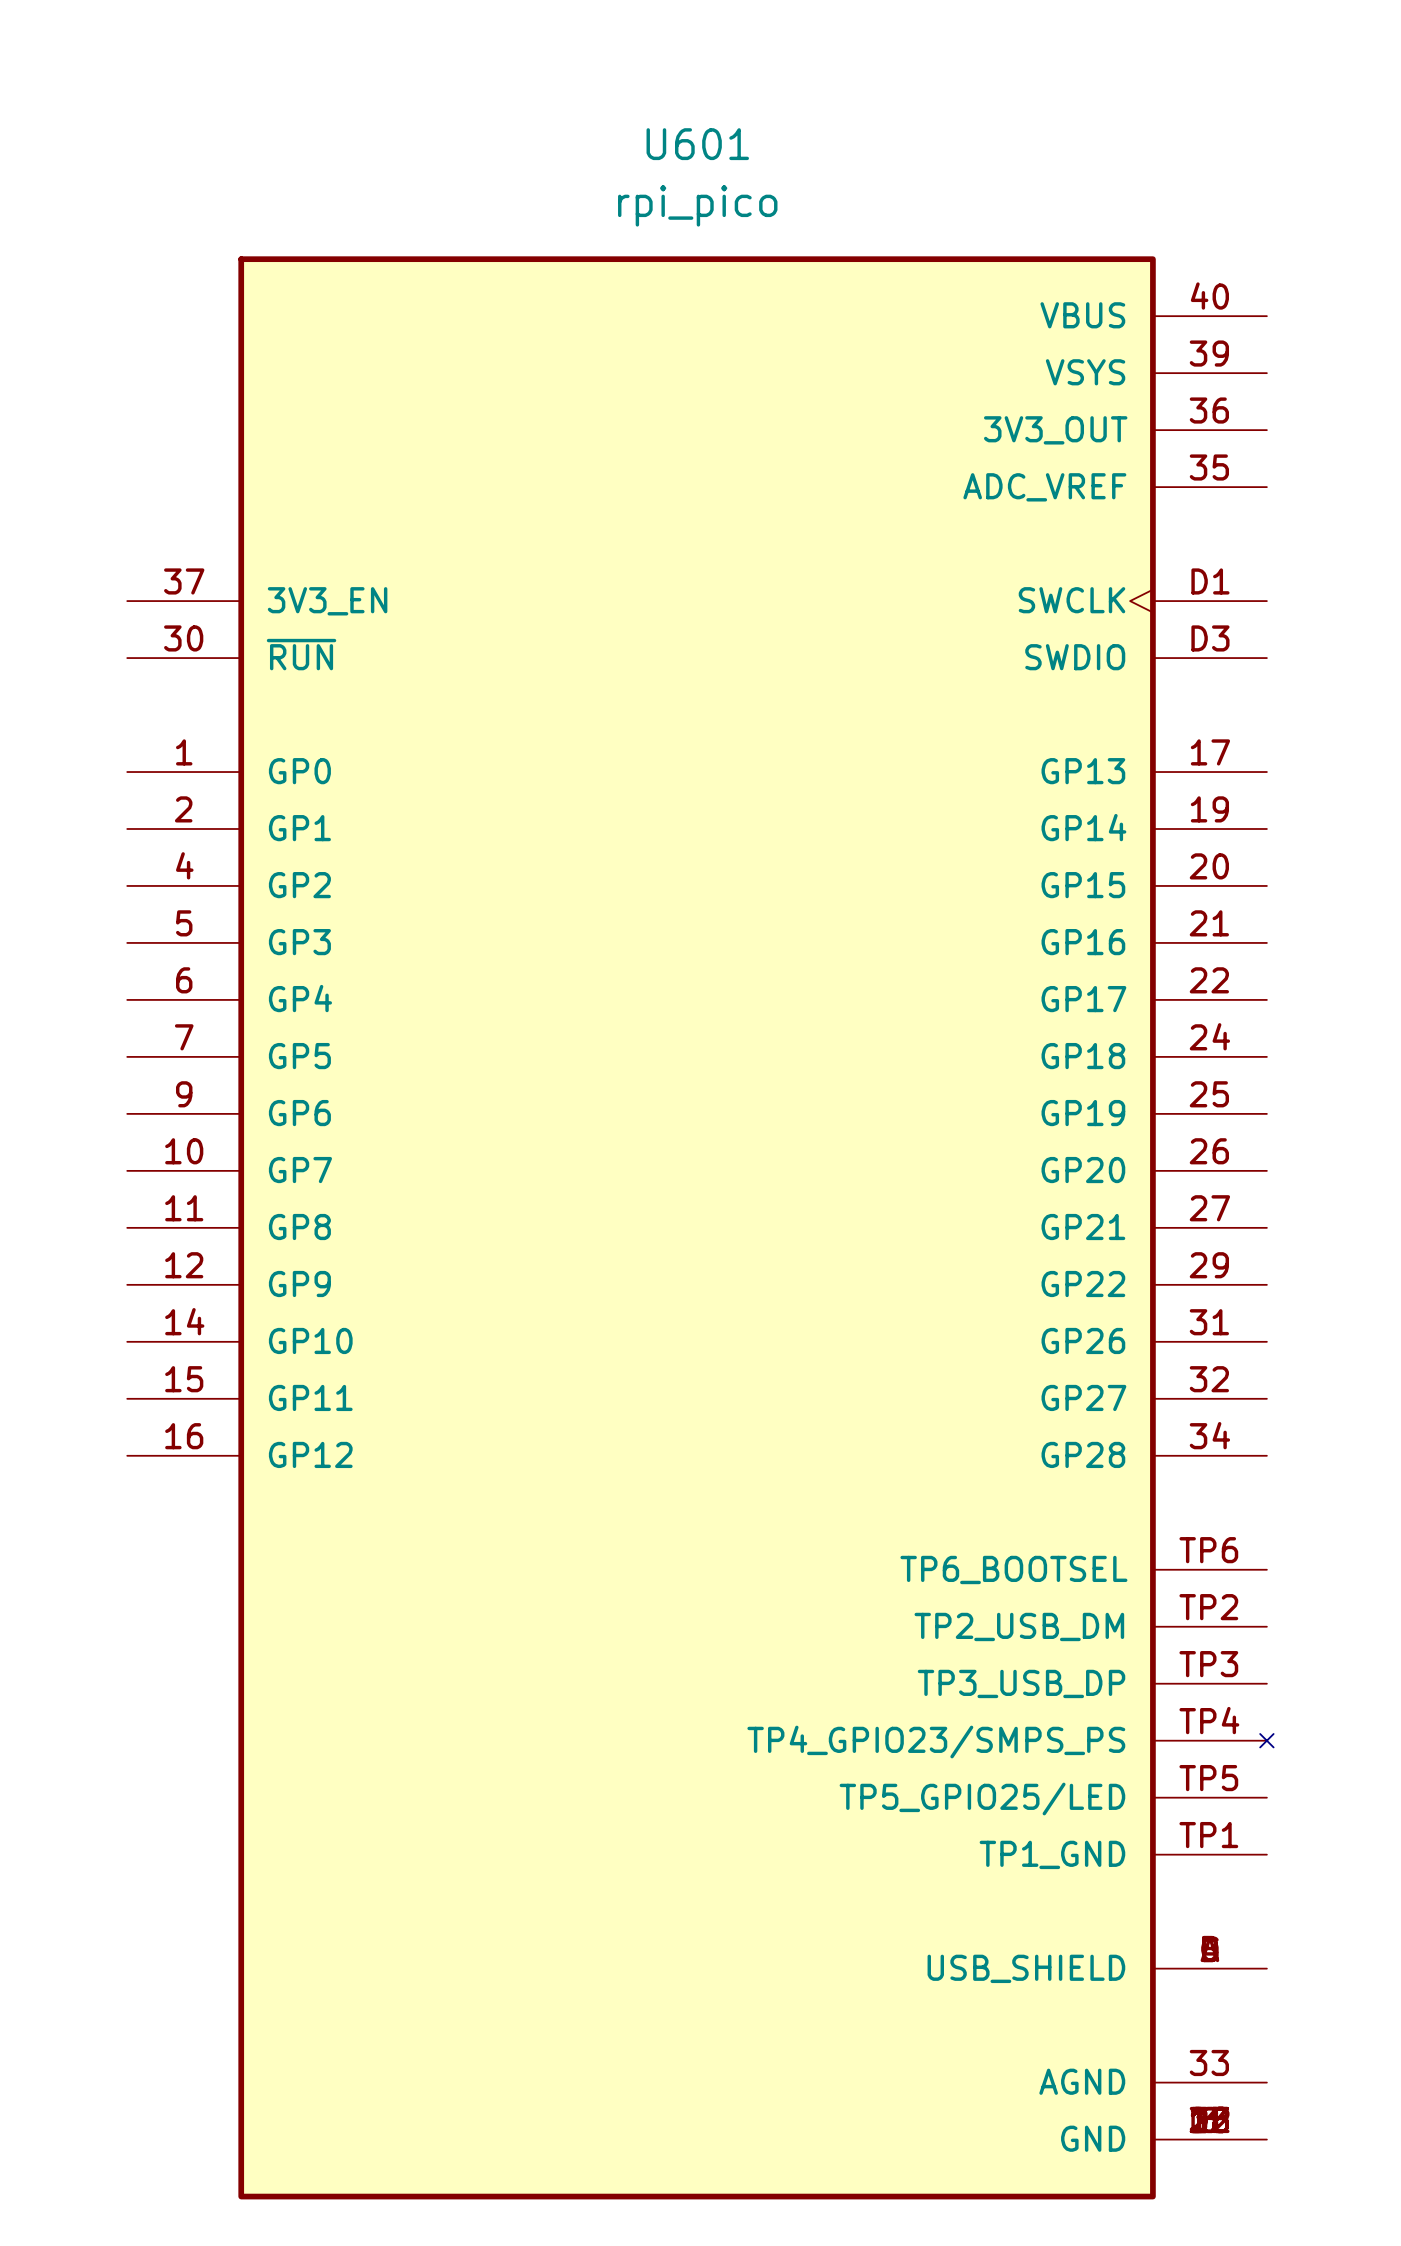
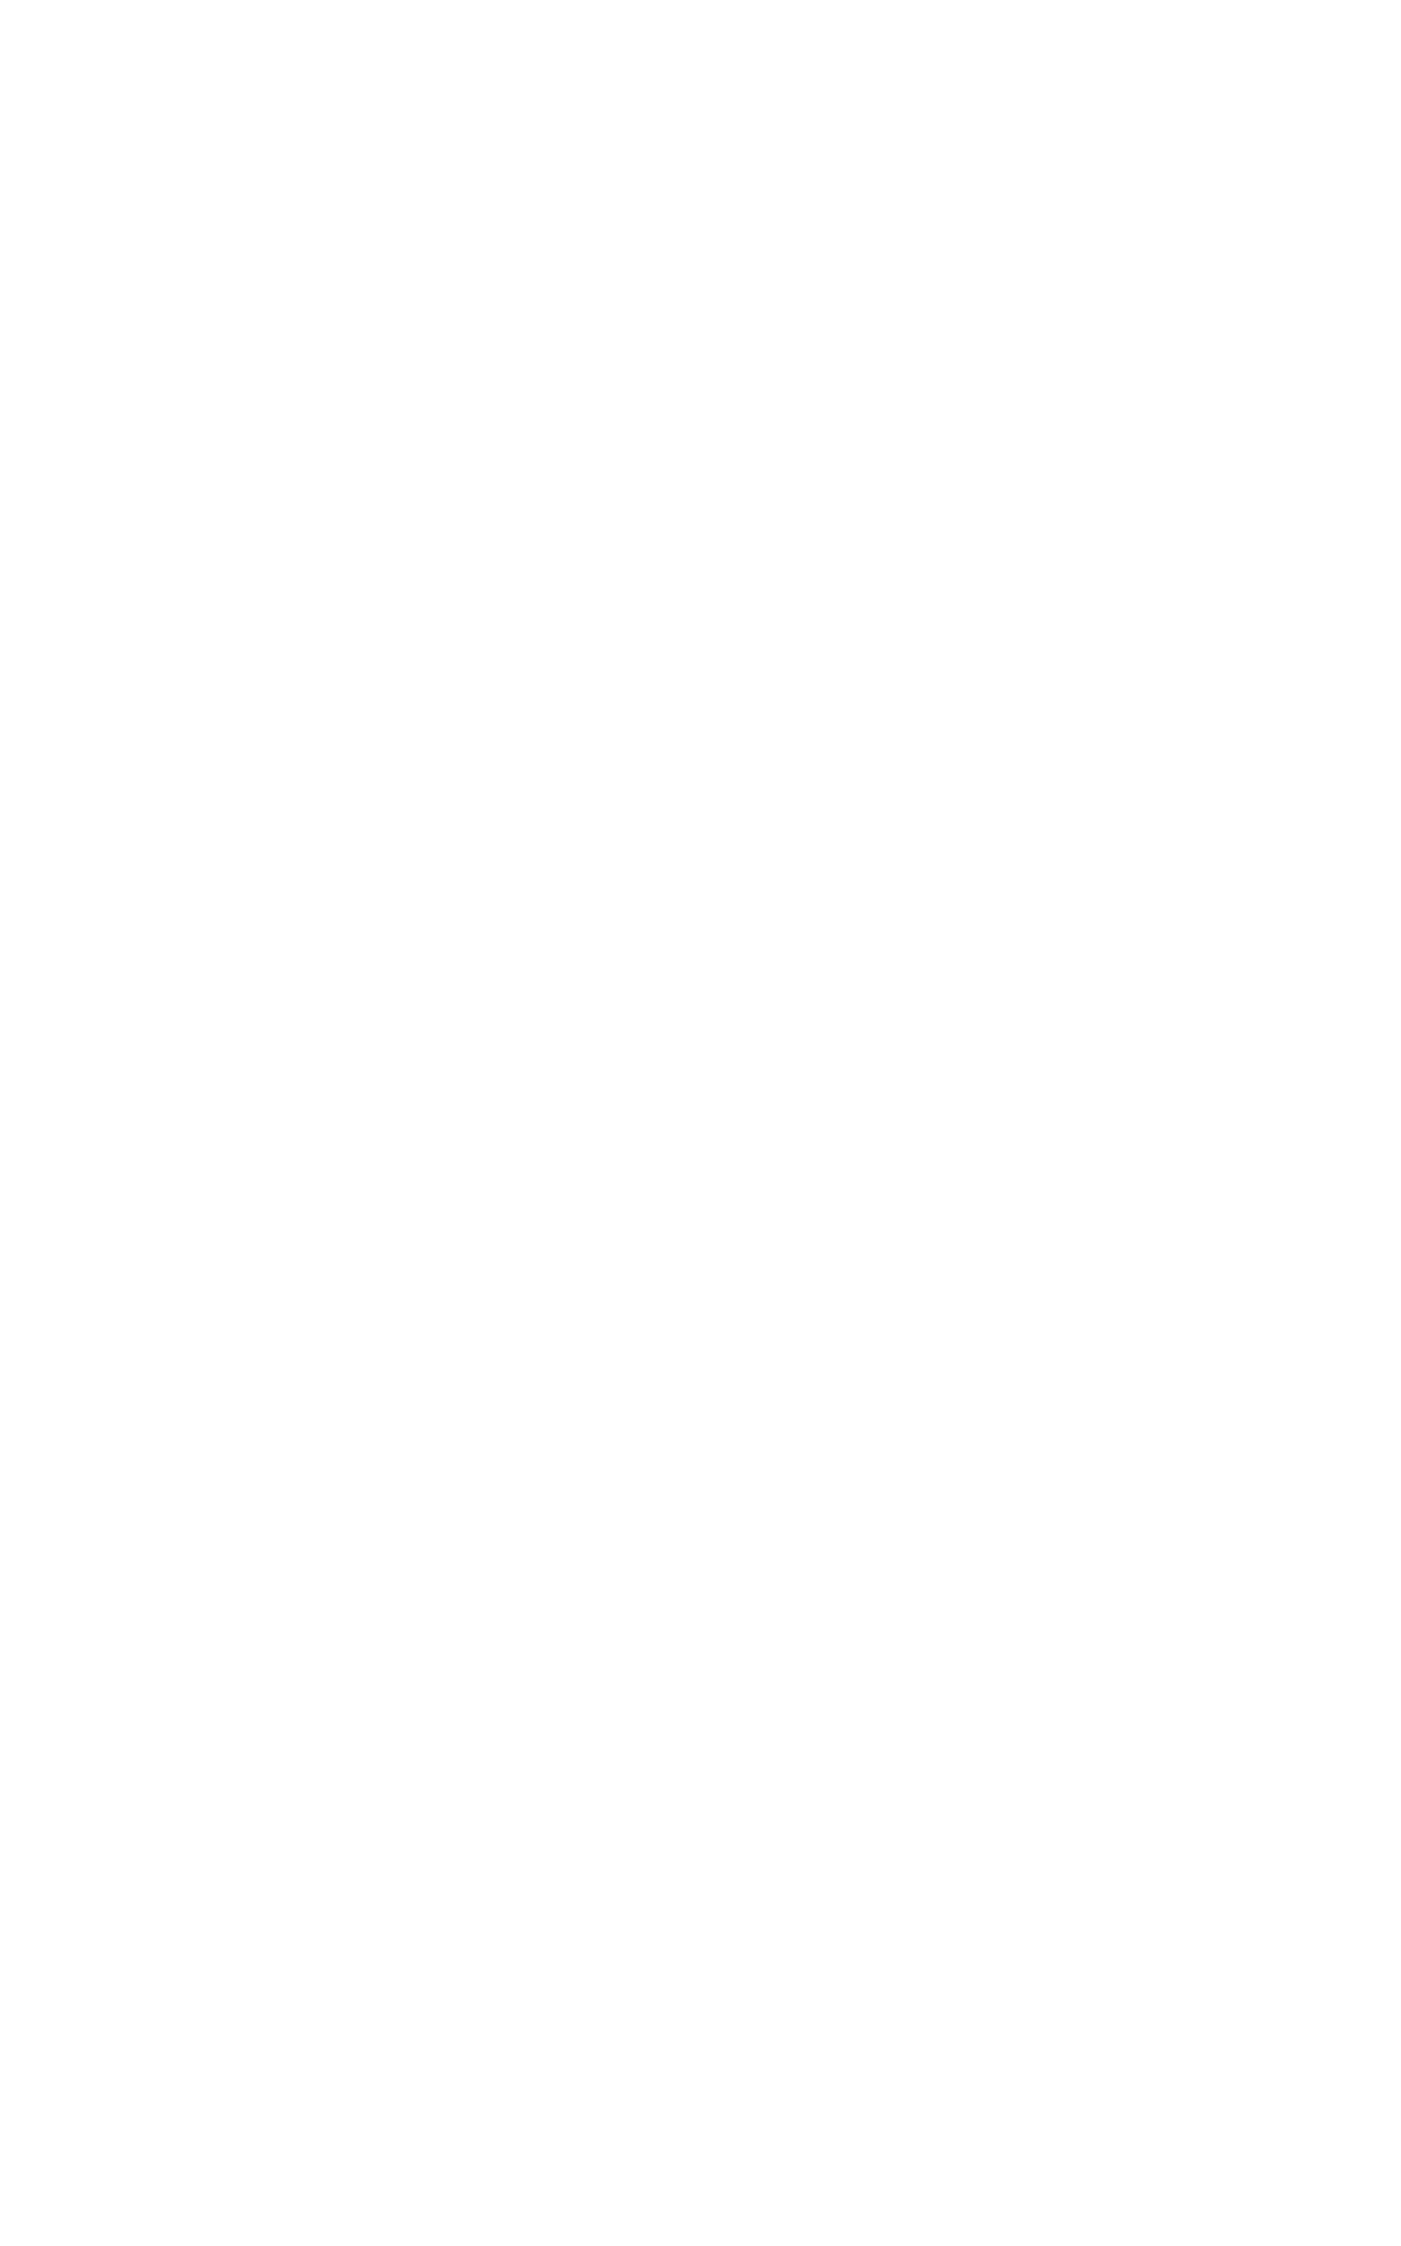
U601: rpi_pico (700, 1227) -> none

